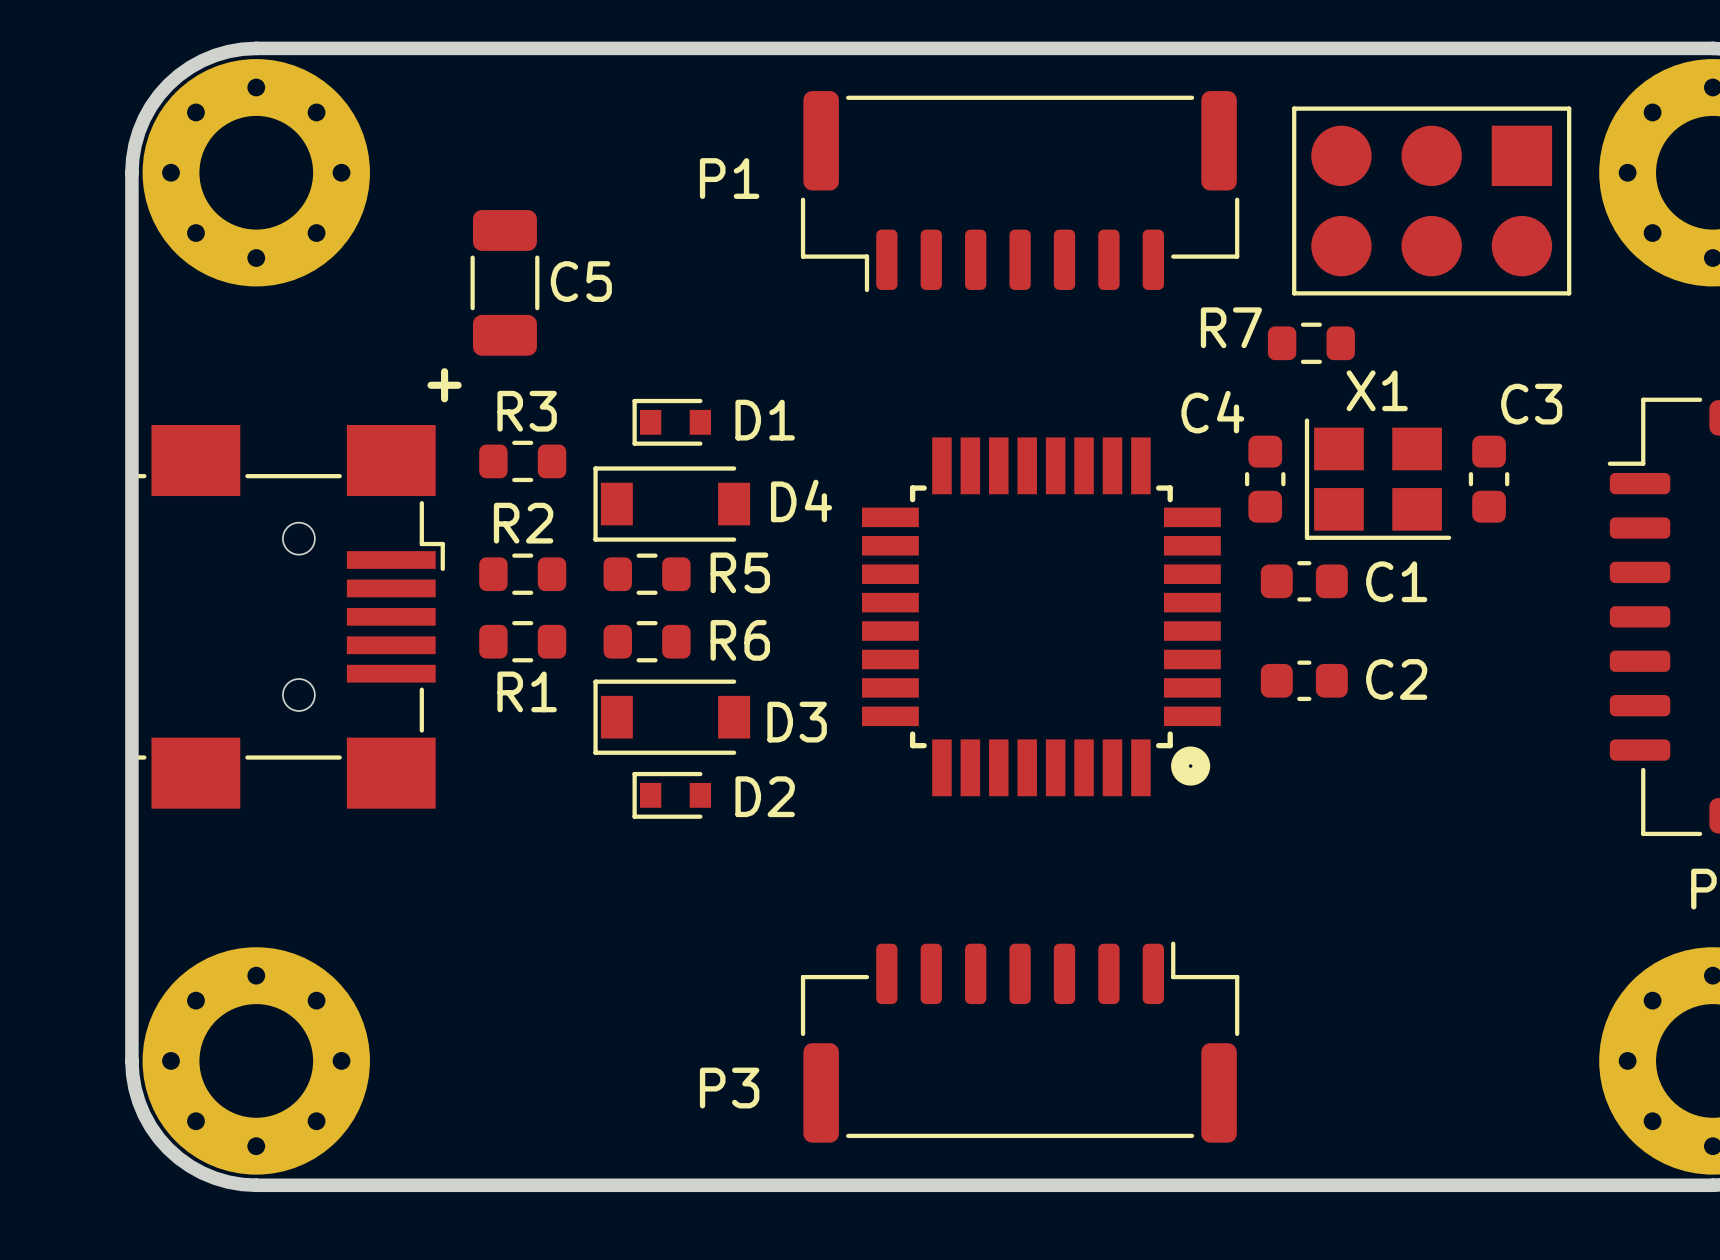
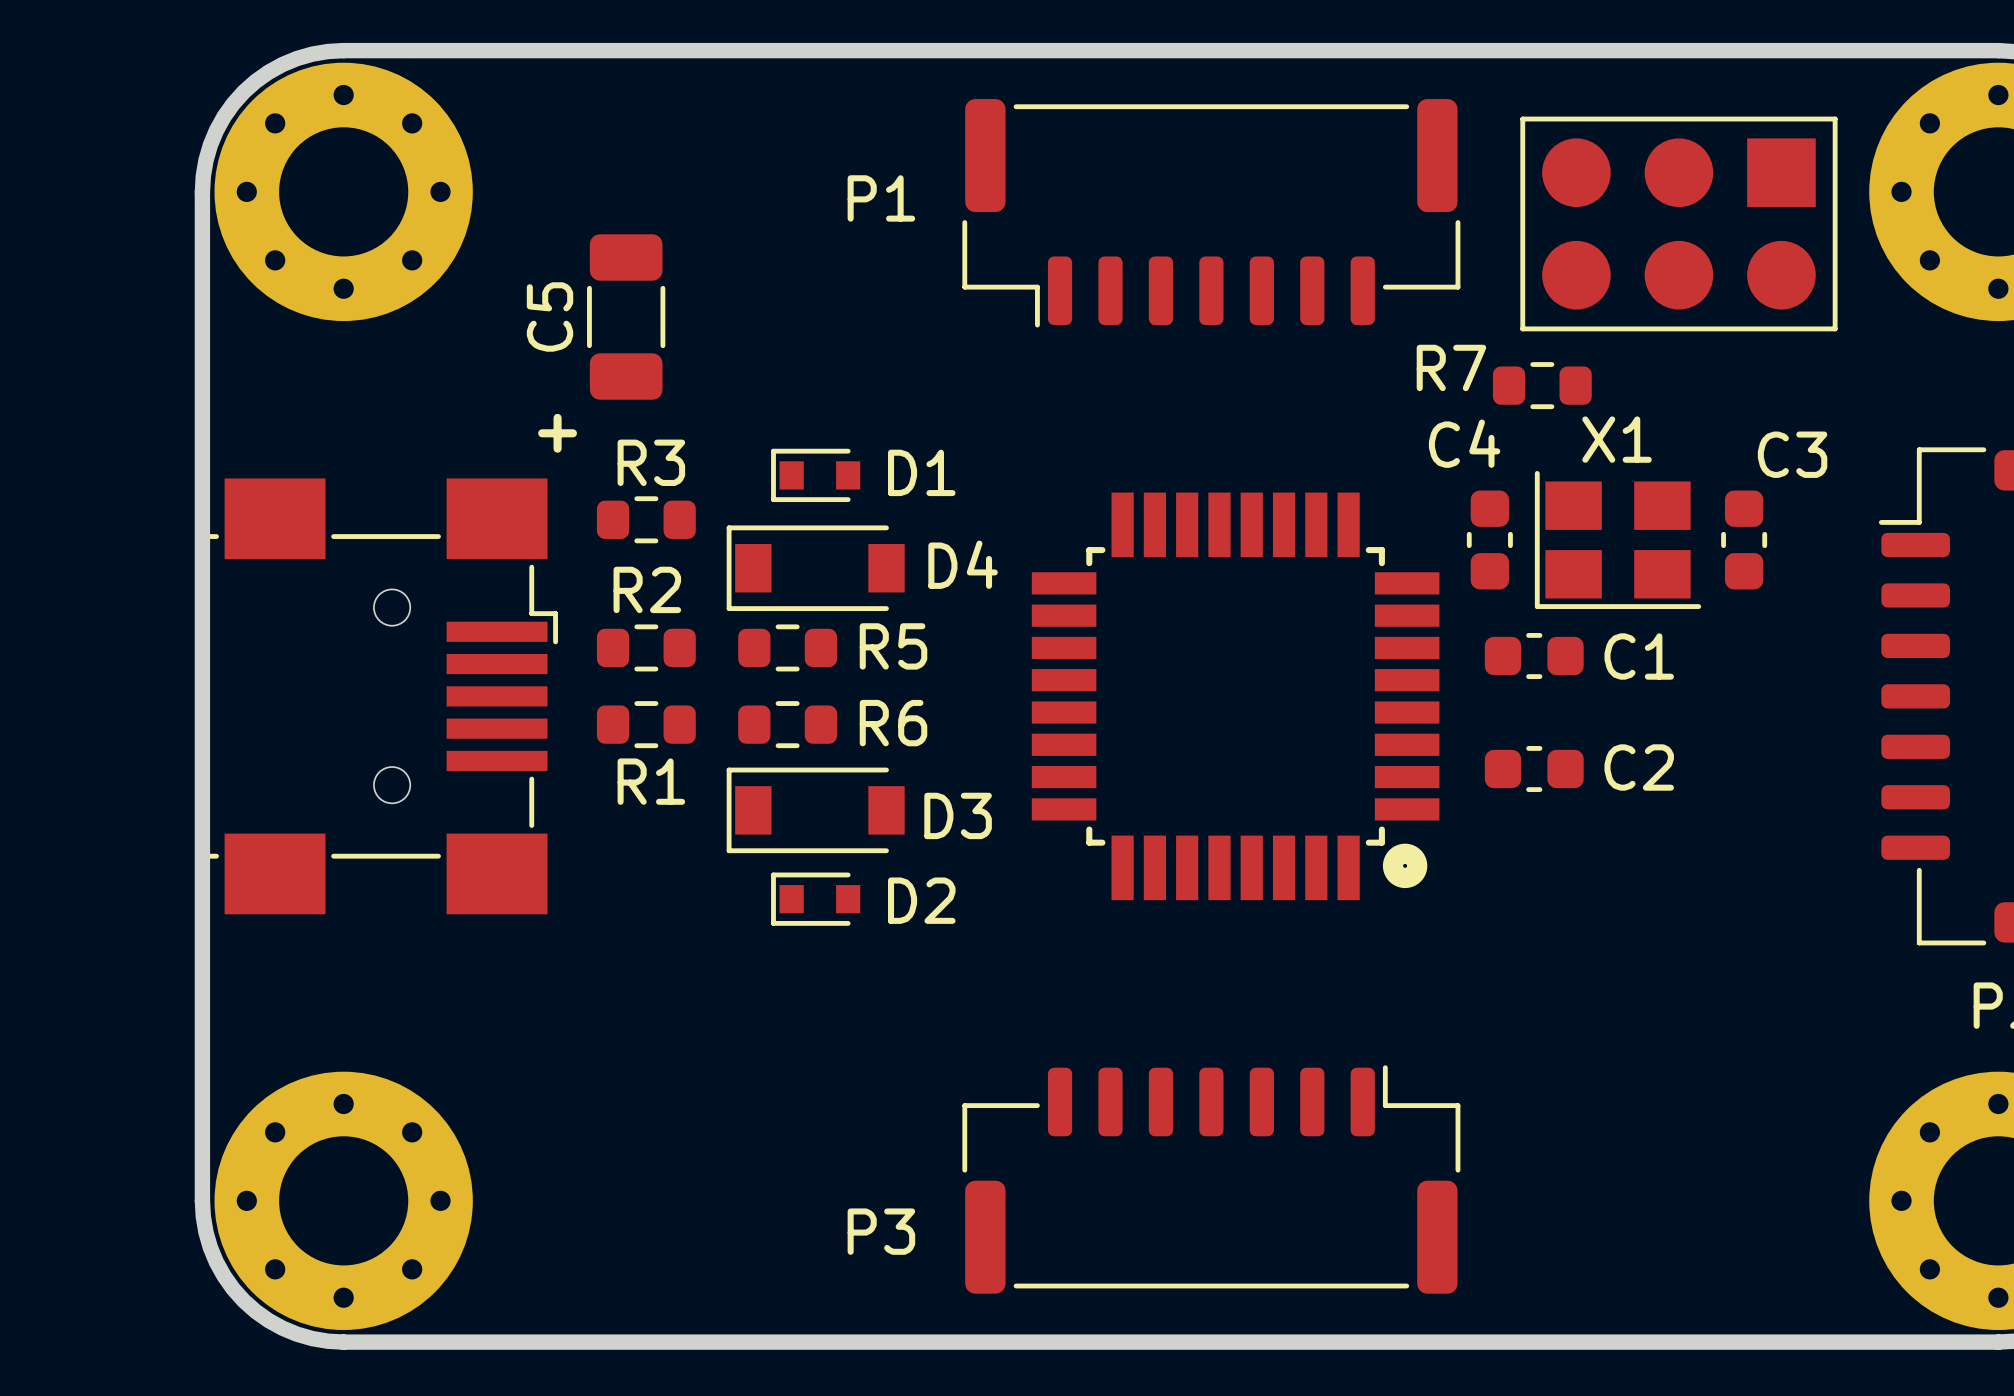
C5 name rotation: 0° (581, 281) -> 90° counterclockwise (550, 316)
C5 name position: C5 (581, 281) -> C5 (550, 316)
C4 name position: C4 (1212, 412) -> C4 (1464, 443)

